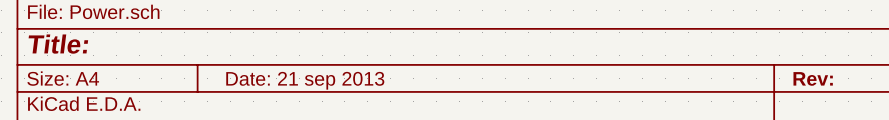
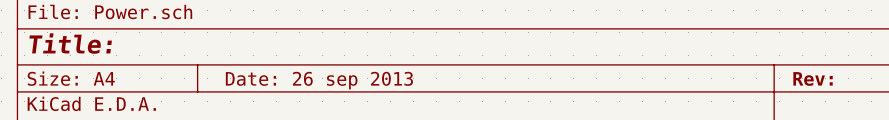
title block: Date: 21 sep 2013 (305, 80) -> Date: 26 sep 2013 (319, 80)

